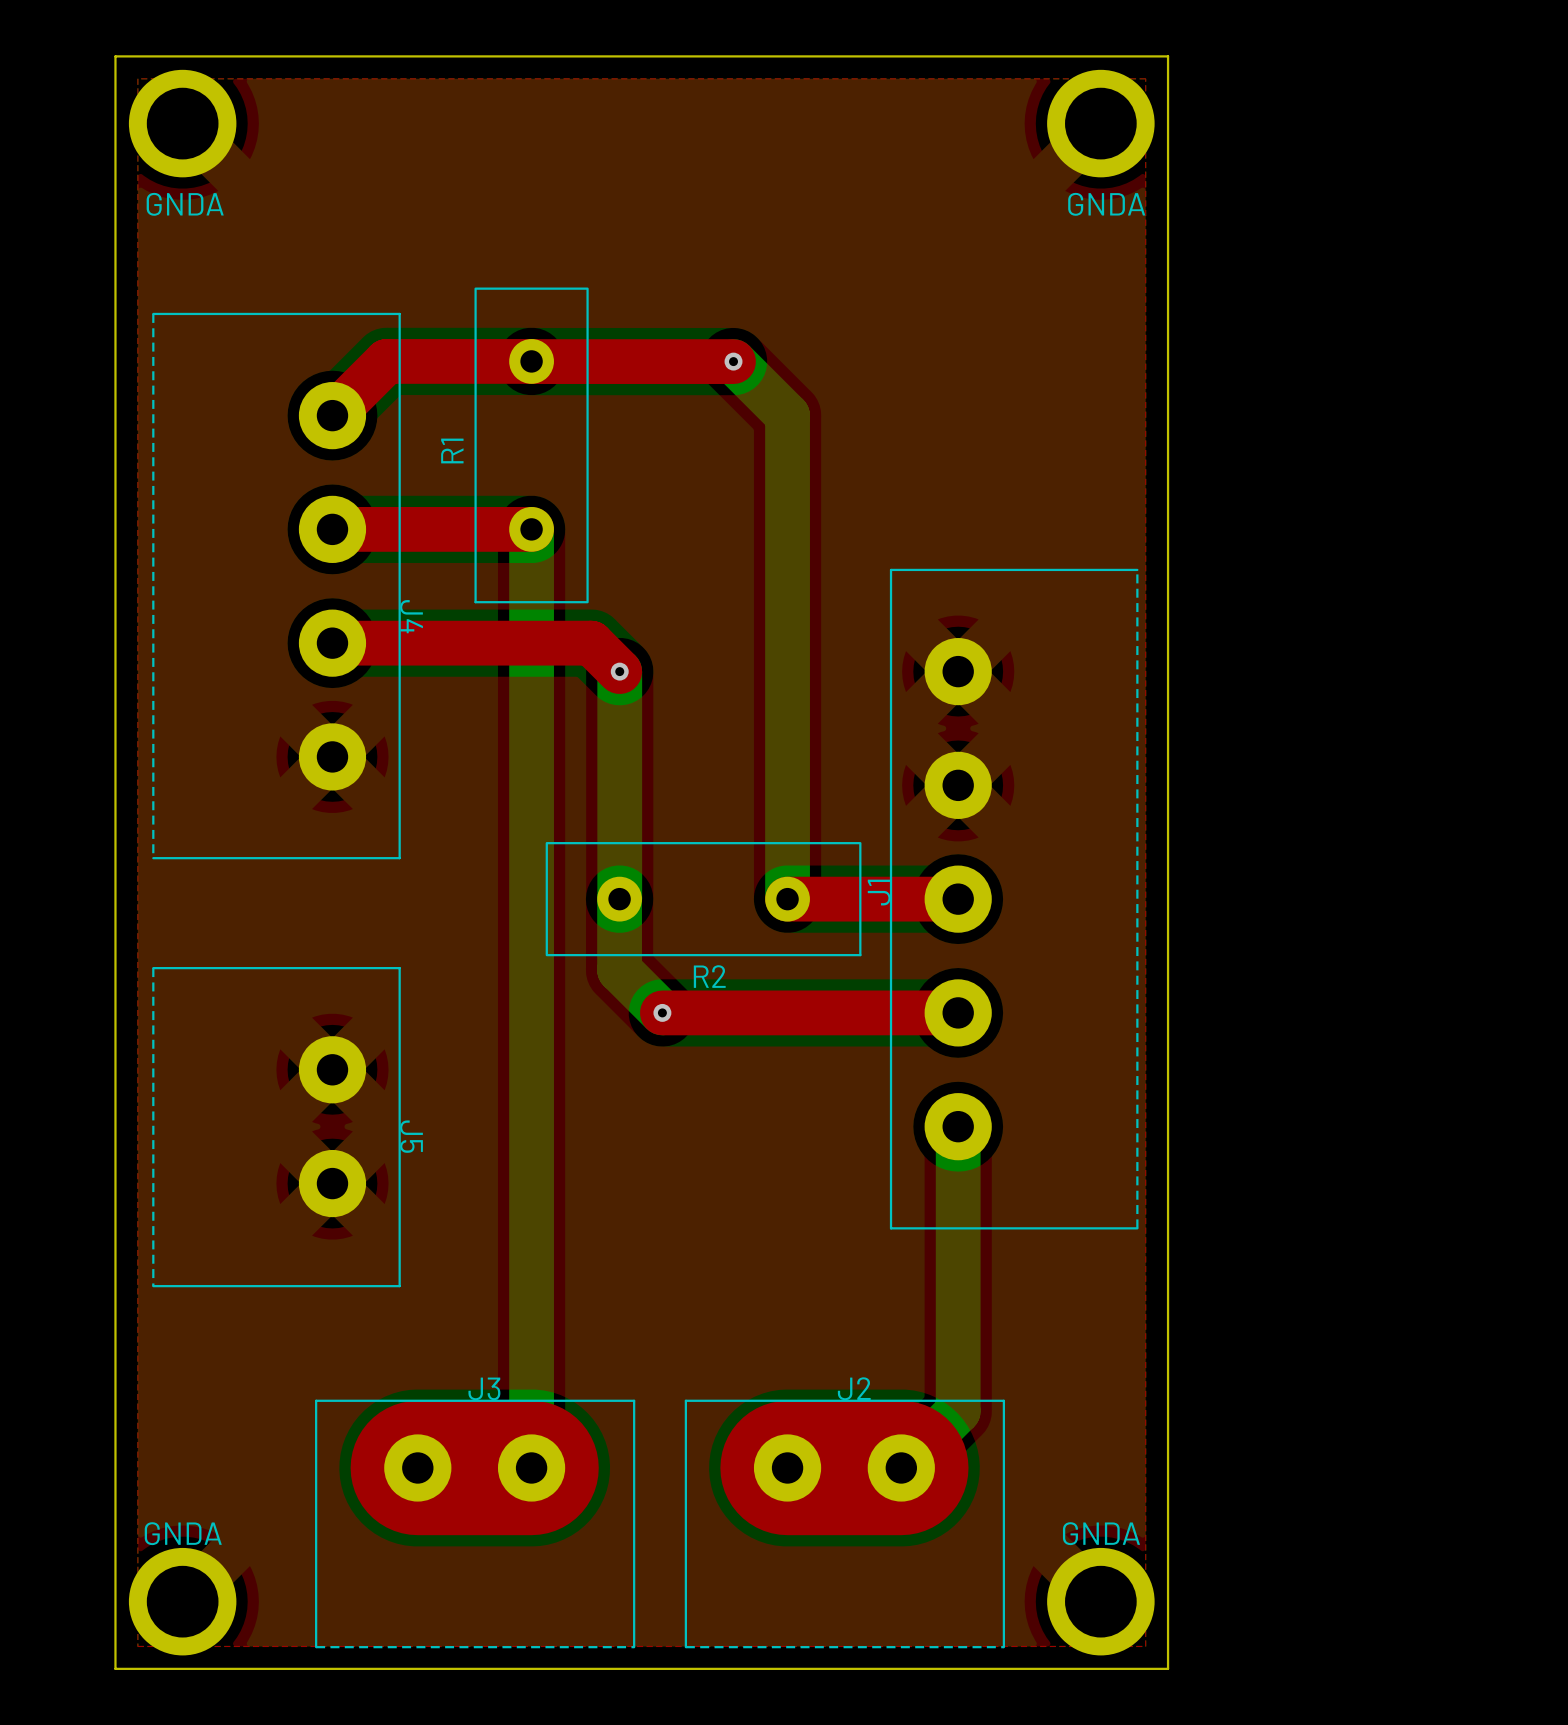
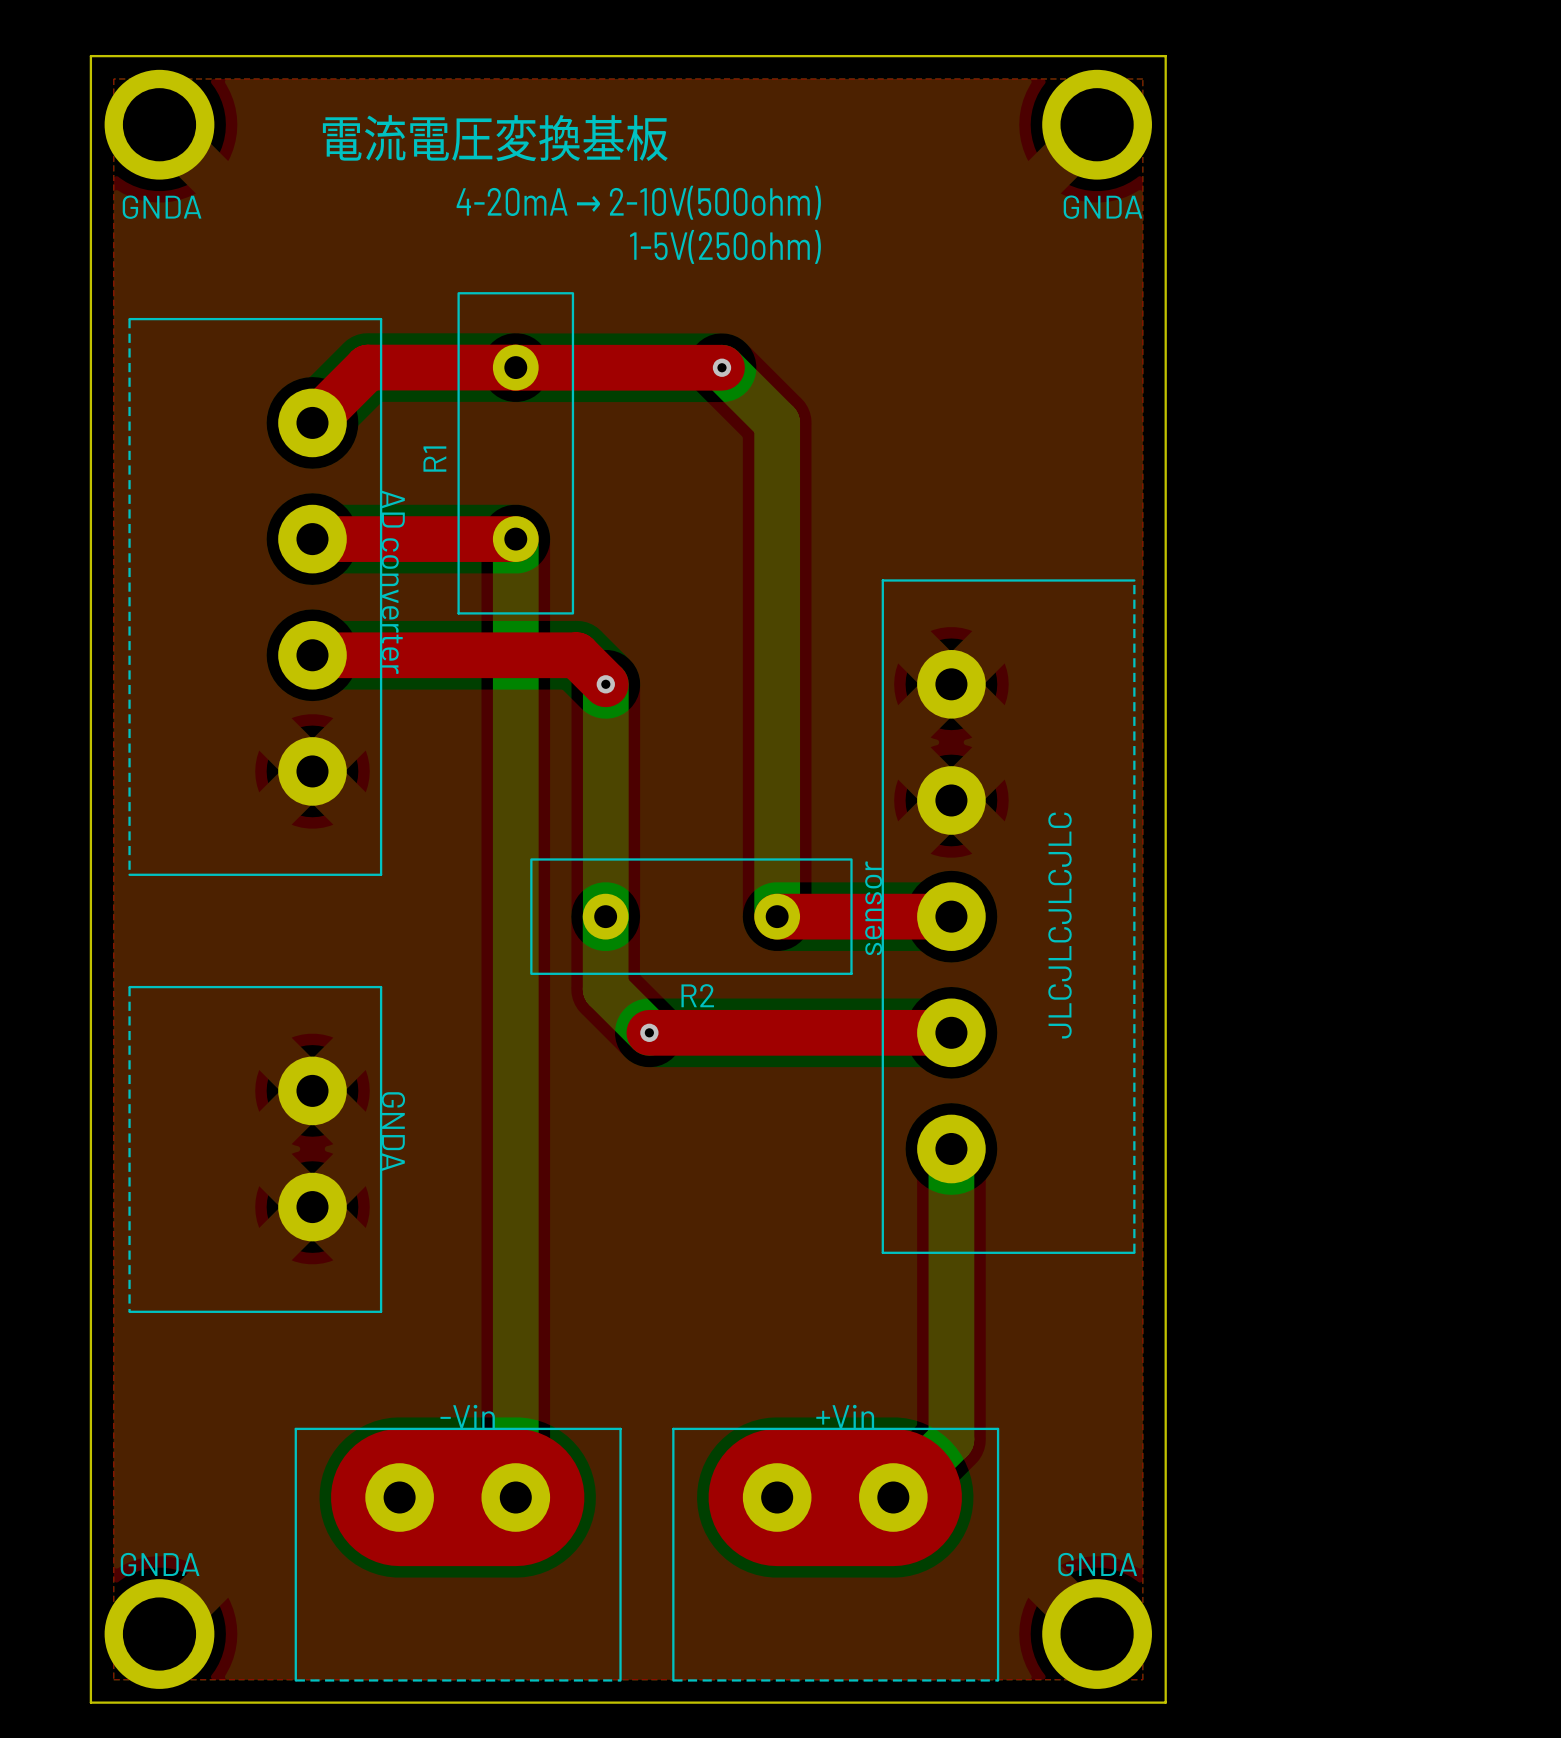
text: none -> 電流電圧変換基板 (495, 138)
text: none -> 4-20mA → 2-10V(500ohm) (638, 202)
text: none -> 1-5V(250ohm) (725, 246)
J4 name: J4 (411, 616) -> AD converter (393, 582)
J1 name: J1 (879, 892) -> sensor (873, 908)
text: none -> JLCJLCJLCJLC (1060, 925)
J5 name: J5 (411, 1136) -> GNDA (393, 1131)
J3 name: J3 (484, 1388) -> -Vin (467, 1416)
J2 name: J2 (854, 1388) -> +Vin (845, 1416)

